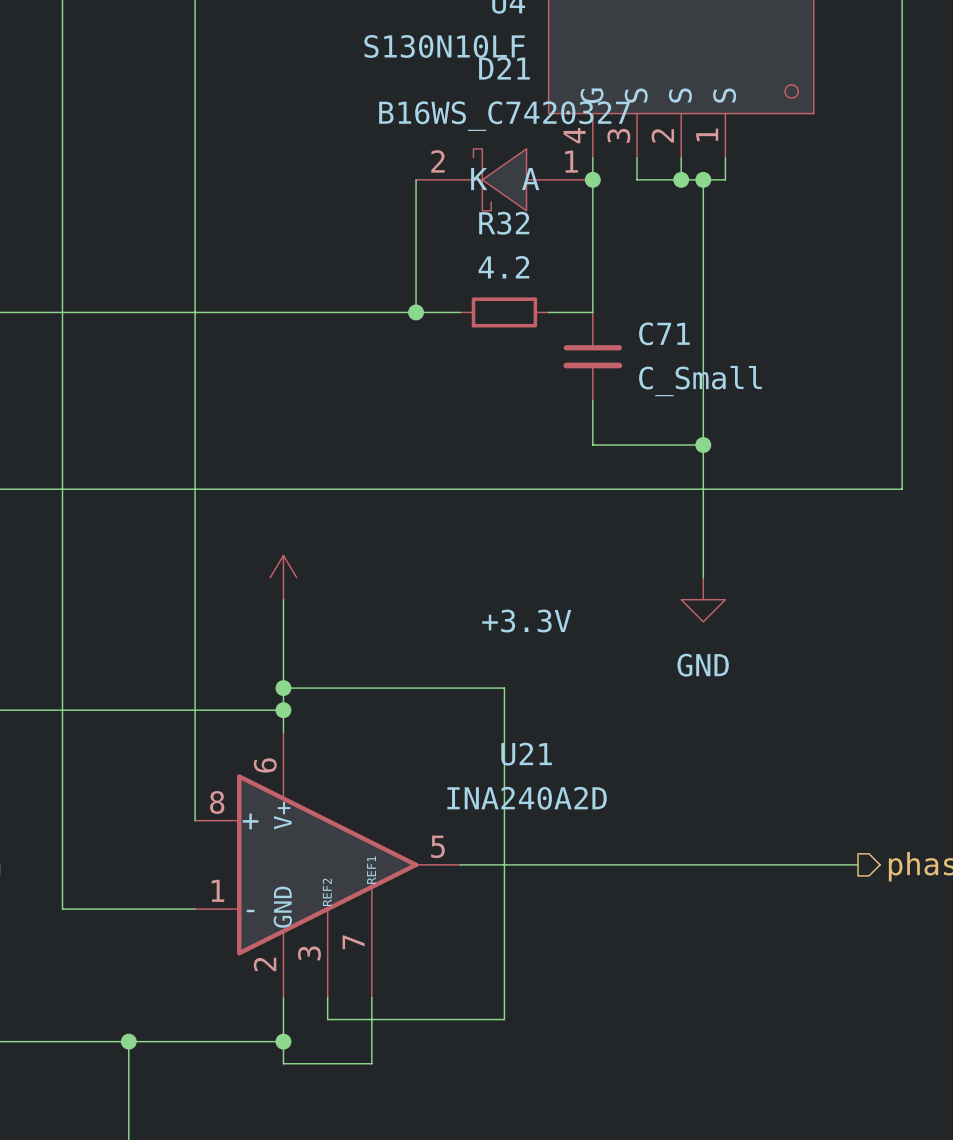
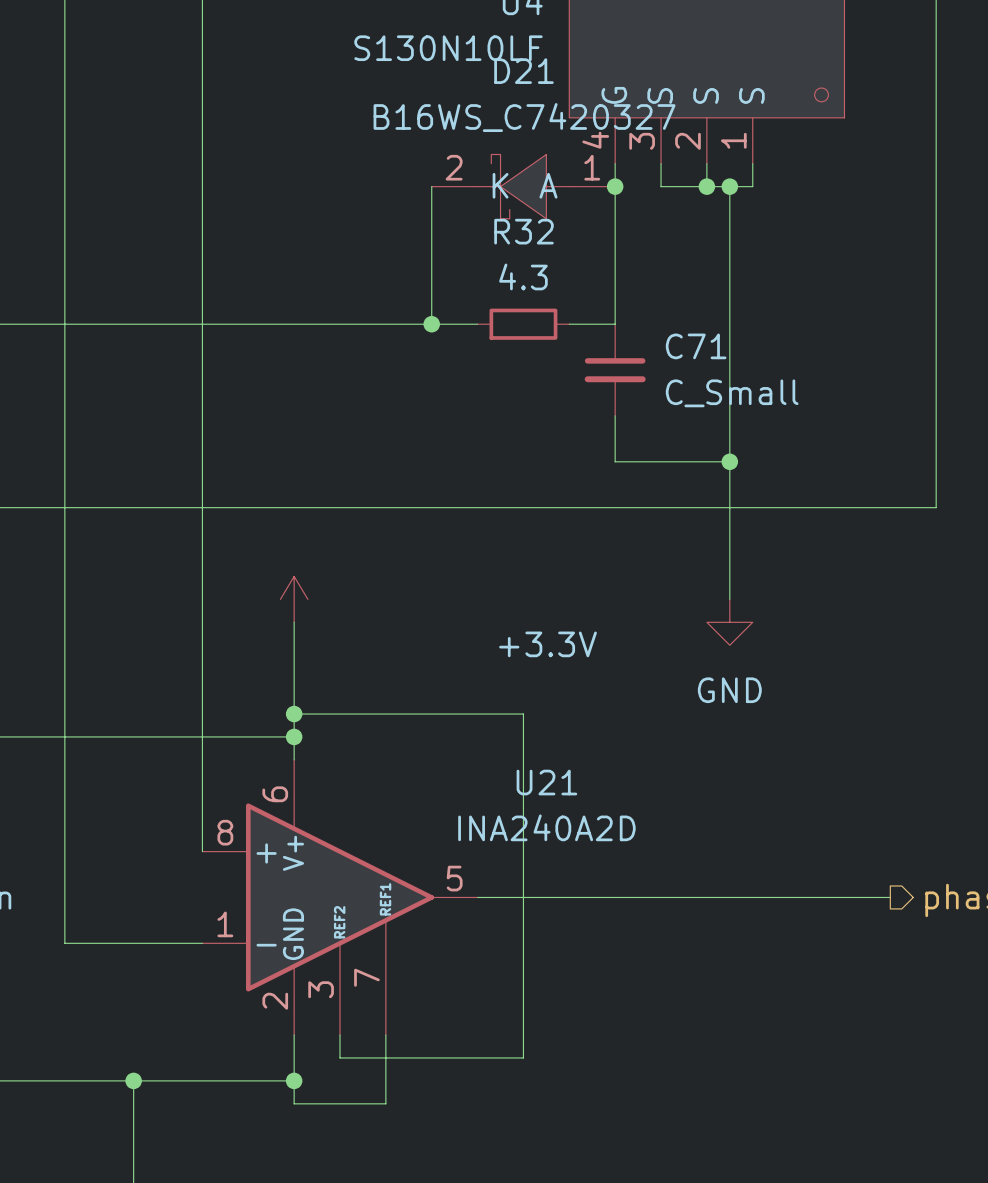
R32 value: 4.2 (503, 267) -> 4.3 (523, 276)

